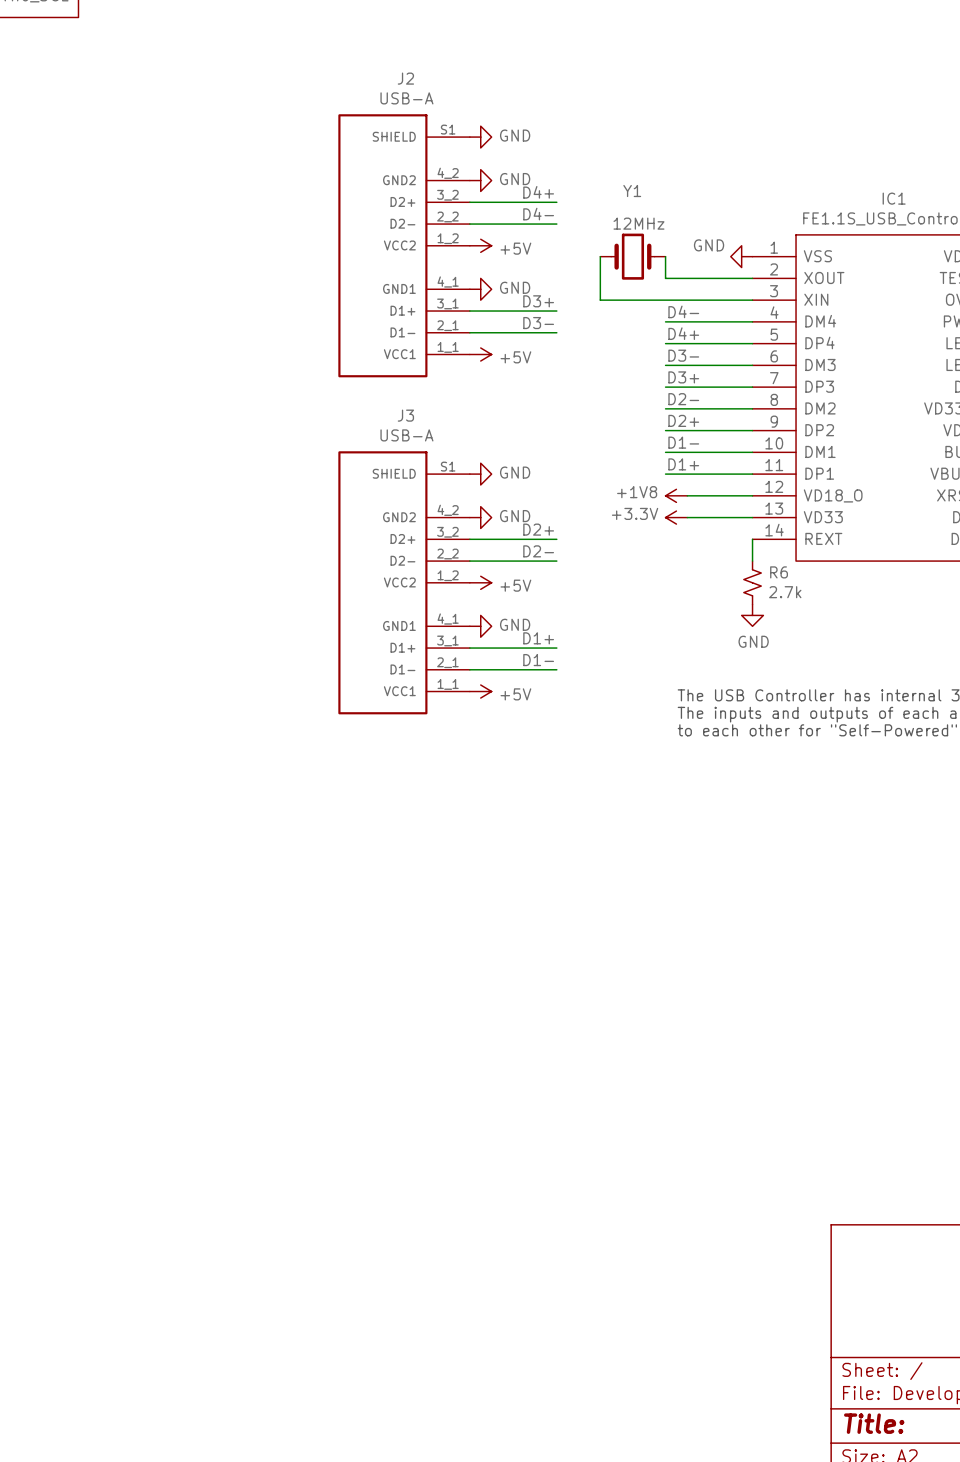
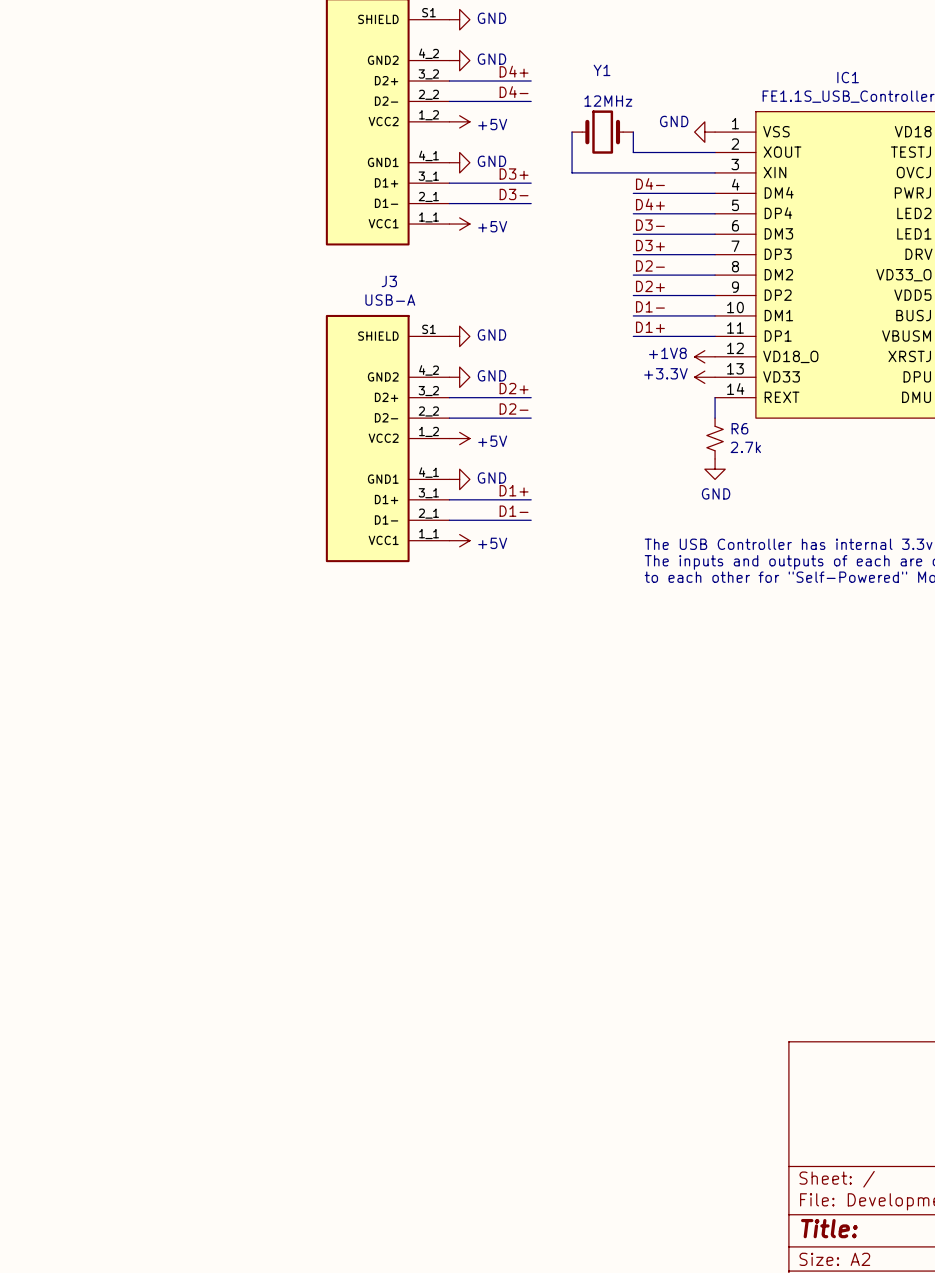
power symbol position: +1V8 (676, 495) -> +1V8 (704, 356)
wire: (687, 495) (752, 495) -> none
power symbol position: +3.3V (676, 517) -> +3.3V (704, 377)
wire: (687, 517) (752, 517) -> none

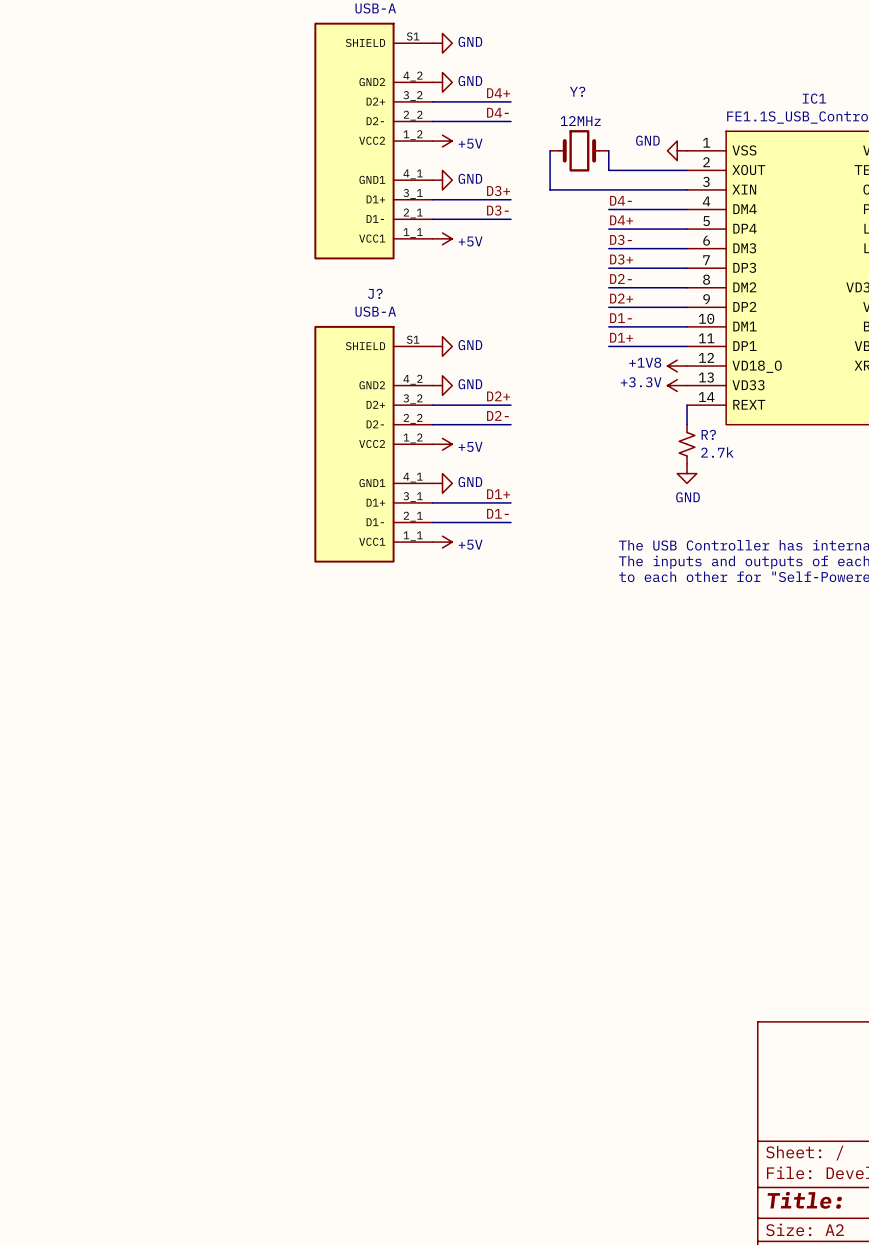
Y1 name: Y1 (602, 70) -> Y? (577, 91)
J3 name: J3 (389, 281) -> J? (375, 293)
R6 name: R6 (739, 428) -> R? (708, 434)

